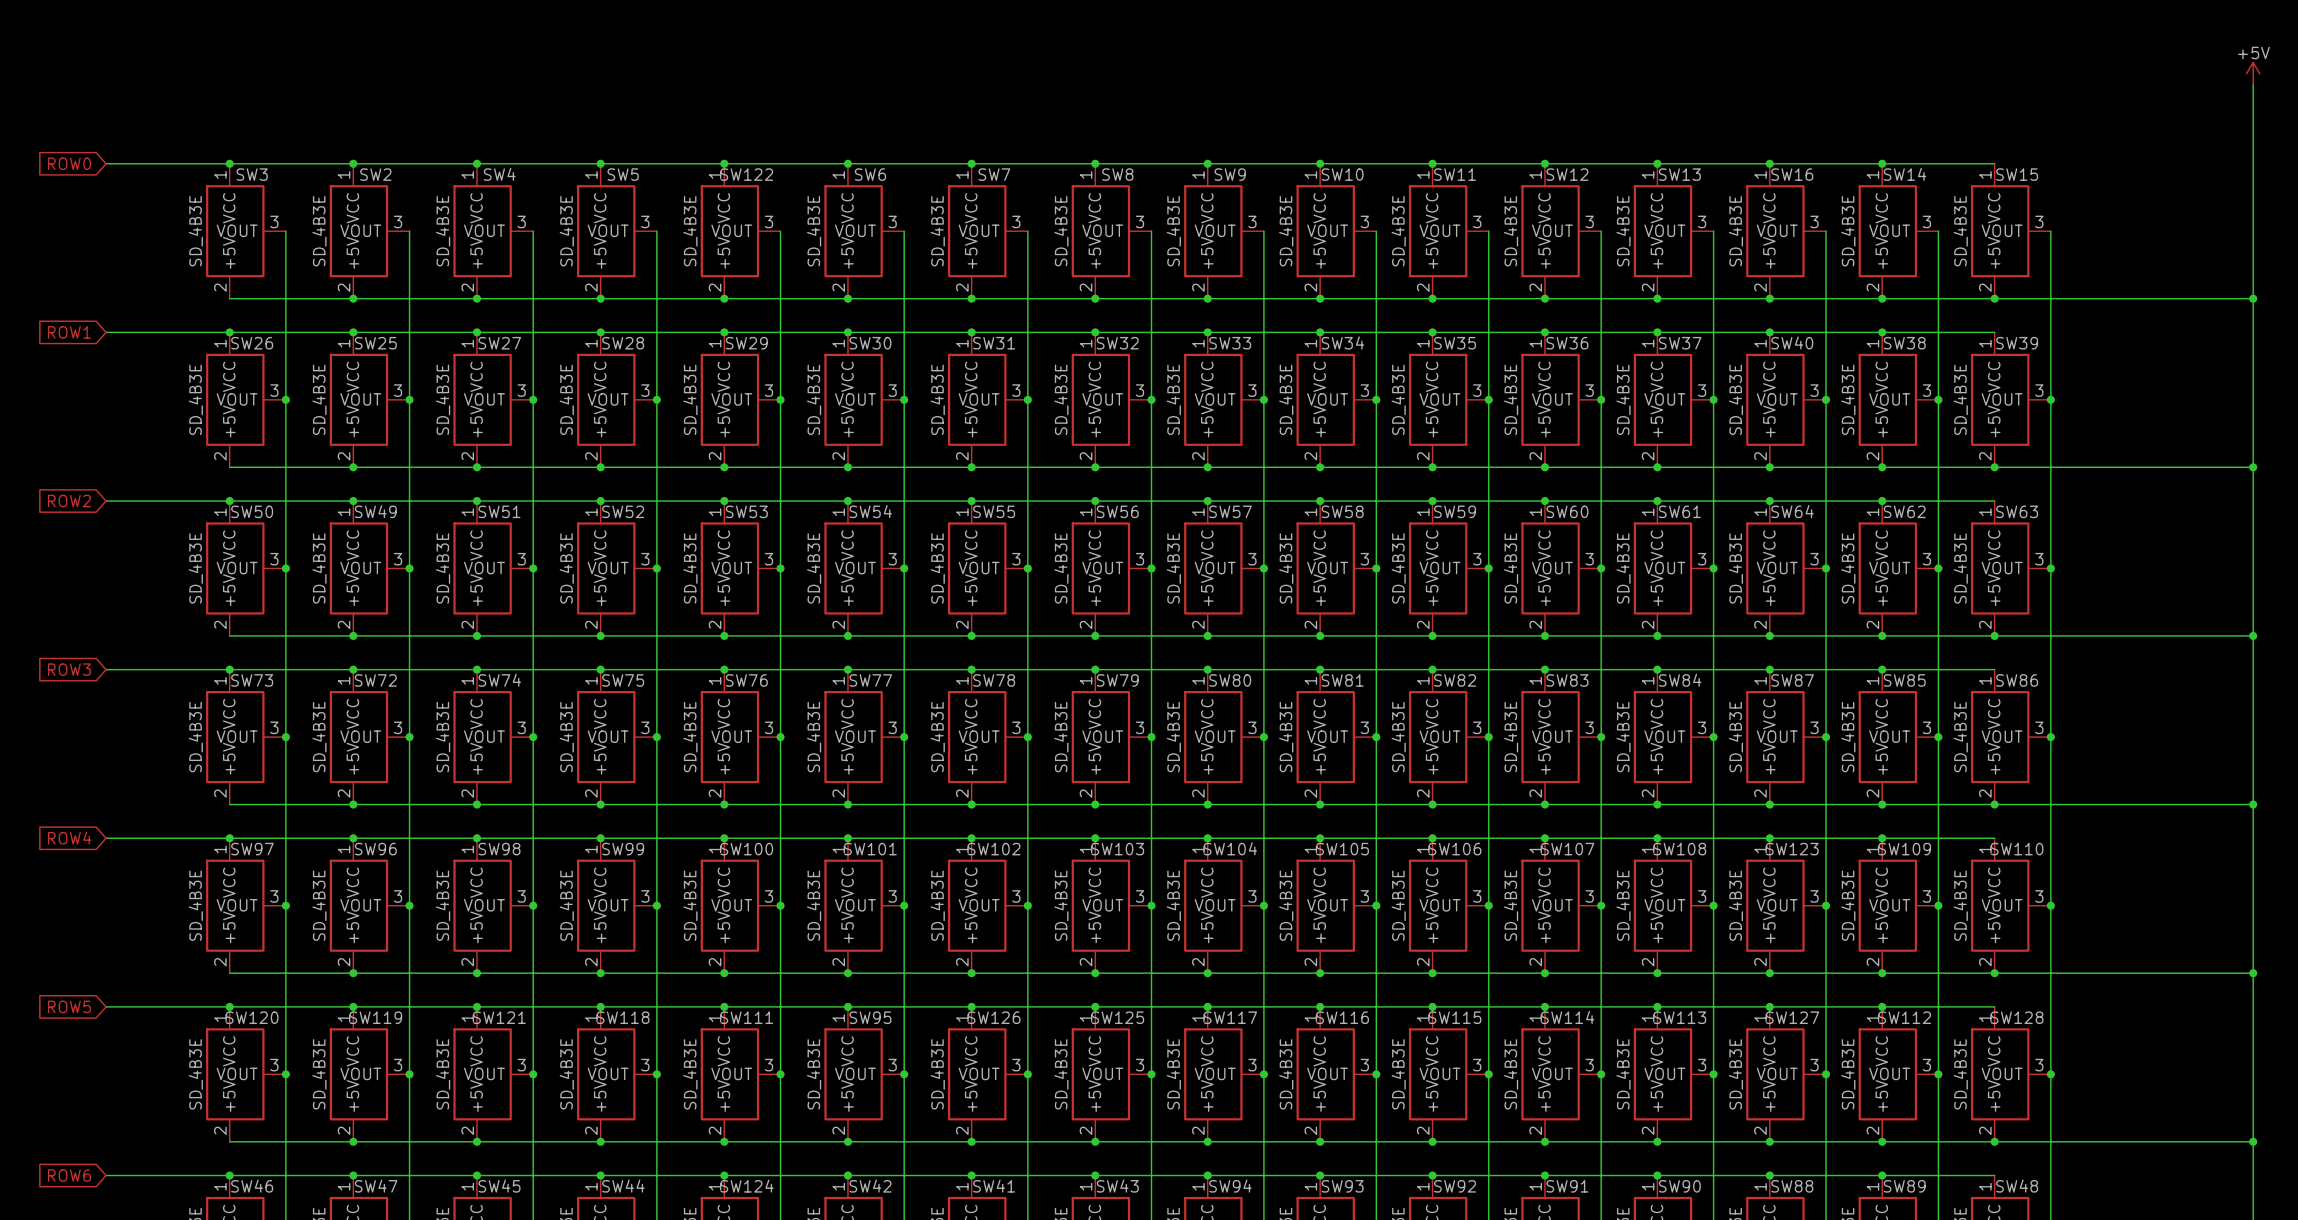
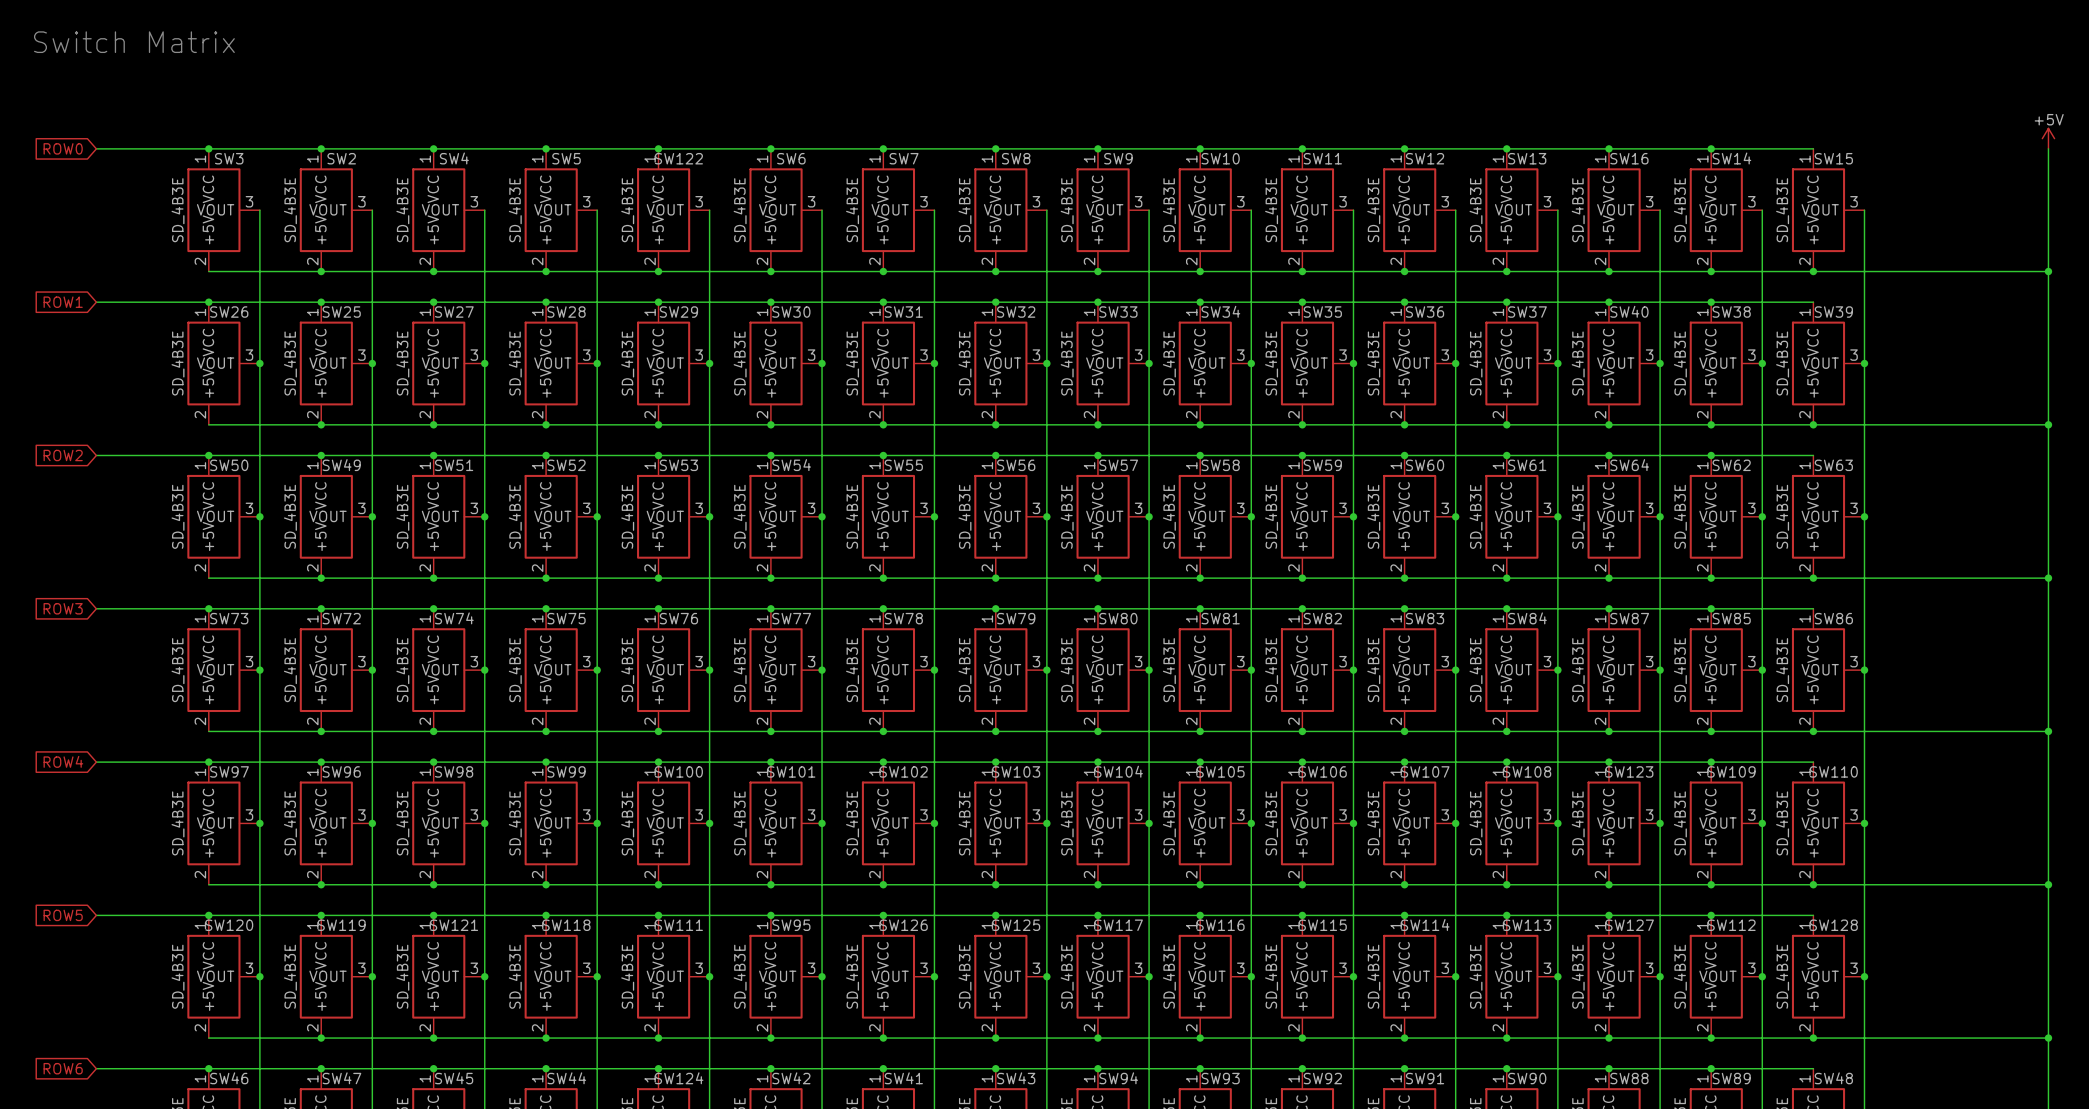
text: none -> Switch Matrix (134, 42)
power symbol position: +5V (2253, 73) -> +5V (2048, 138)
wire: (2253, 85) (2253, 163) -> none

